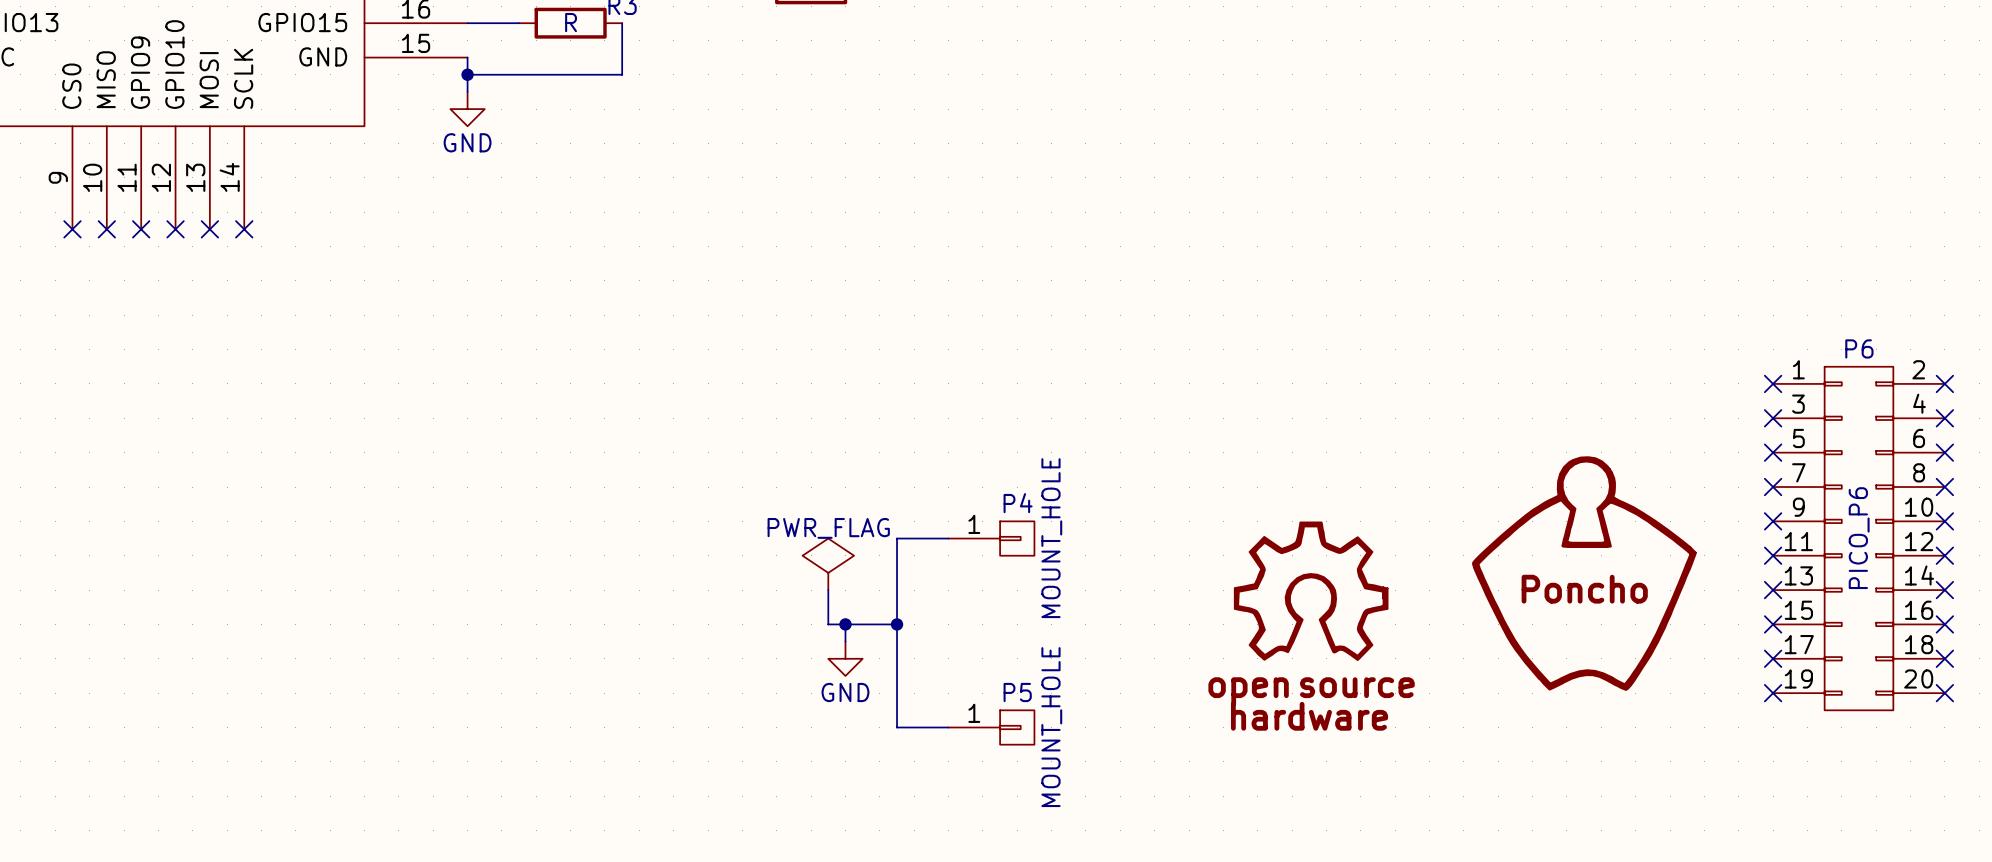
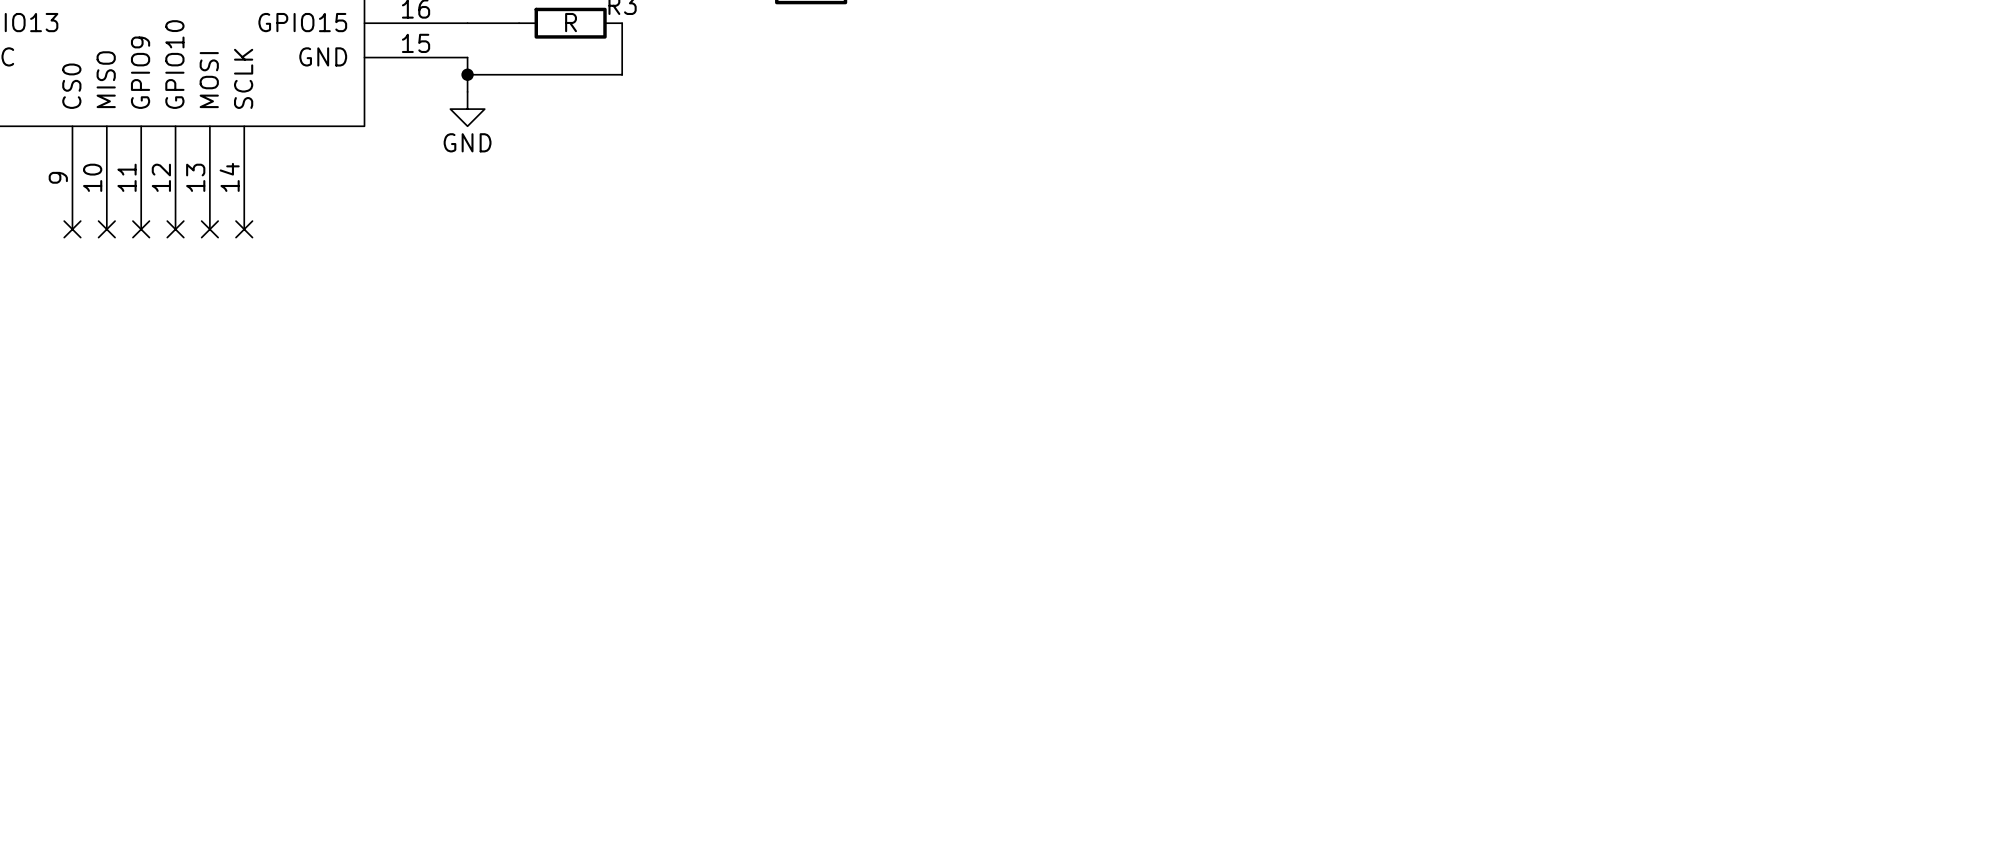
no-connect mark: (1773, 383) -> none
no-connect mark: (1944, 383) -> none
no-connect mark: (1773, 418) -> none
no-connect mark: (1944, 418) -> none
no-connect mark: (1773, 452) -> none
no-connect mark: (1944, 452) -> none
no-connect mark: (1773, 487) -> none
no-connect mark: (1944, 487) -> none
no-connect mark: (1773, 521) -> none
no-connect mark: (1944, 521) -> none
wire: (948, 538) (897, 538) (897, 727) (948, 727) -> none
P4: MOUNT_HOLE (991, 538) -> none
P6: PICO_P6 (1858, 538) -> none
no-connect mark: (1773, 555) -> none
no-connect mark: (1944, 555) -> none
power symbol: PWR_FLAG (828, 564) -> none
power symbol: (1584, 573) -> none
wire: (828, 590) (828, 624) (897, 624) -> none
no-connect mark: (1773, 590) -> none
no-connect mark: (1944, 590) -> none
power symbol: (1311, 591) -> none
wire: (845, 624) (845, 641) -> none
junction: (845, 624) -> none
junction: (897, 624) -> none
no-connect mark: (1773, 624) -> none
no-connect mark: (1944, 624) -> none
power symbol: GND (845, 658) -> none
no-connect mark: (1773, 658) -> none
no-connect mark: (1944, 658) -> none
no-connect mark: (1773, 693) -> none
no-connect mark: (1944, 693) -> none
P5: MOUNT_HOLE (991, 727) -> none

